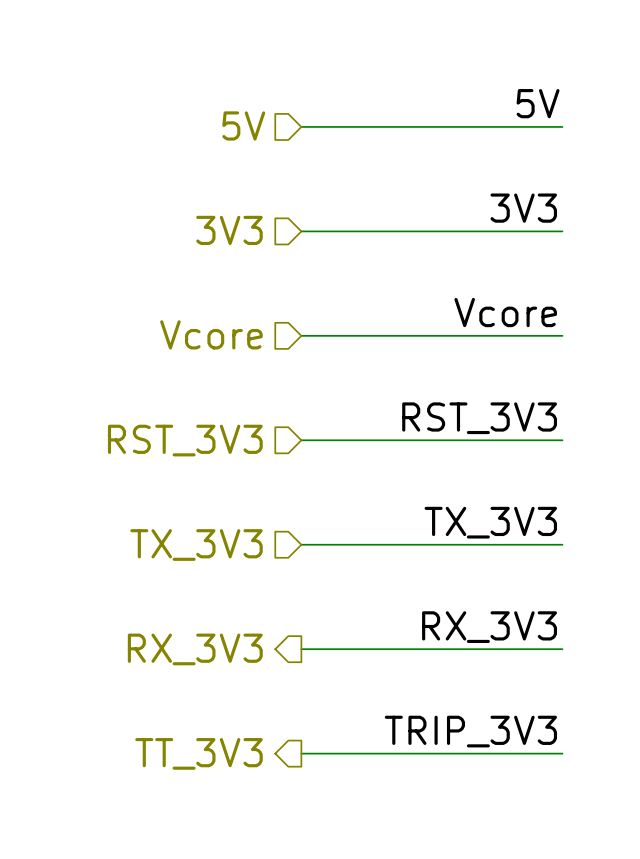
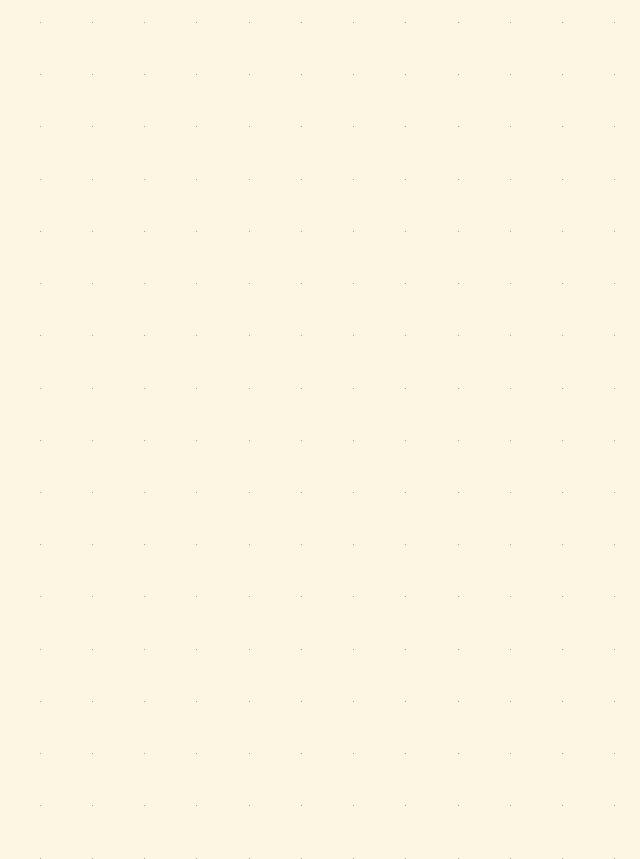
label: 5V (538, 103) -> none
hierarchical label: 5V (243, 125) -> none
wire: (301, 126) (562, 126) -> none
label: 3V3 (523, 208) -> none
hierarchical label: 3V3 (229, 230) -> none
wire: (301, 231) (562, 231) -> none
label: Vcore (505, 312) -> none
hierarchical label: Vcore (211, 334) -> none
wire: (301, 335) (562, 335) -> none
label: RST_3V3 (479, 418) -> none
hierarchical label: RST_3V3 (185, 440) -> none
wire: (301, 440) (562, 440) -> none
label: TX_3V3 (490, 522) -> none
wire: (301, 544) (562, 544) -> none
hierarchical label: TX_3V3 (196, 545) -> none
label: RX_3V3 (489, 627) -> none
hierarchical label: RX_3V3 (195, 649) -> none
wire: (301, 649) (562, 649) -> none
label: TRIP_3V3 (470, 731) -> none
hierarchical label: TT_3V3 (199, 753) -> none
wire: (301, 753) (562, 753) -> none

